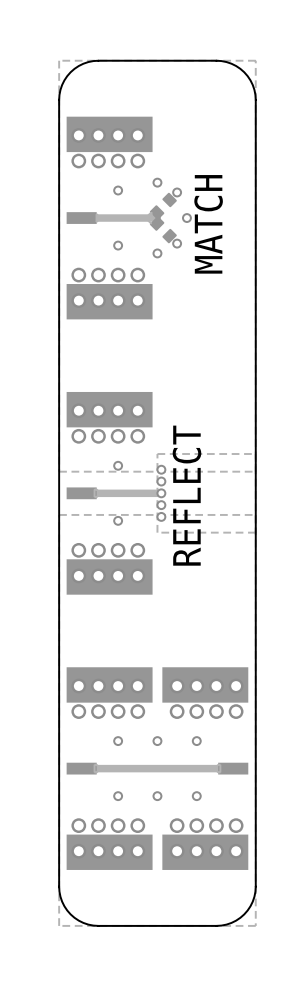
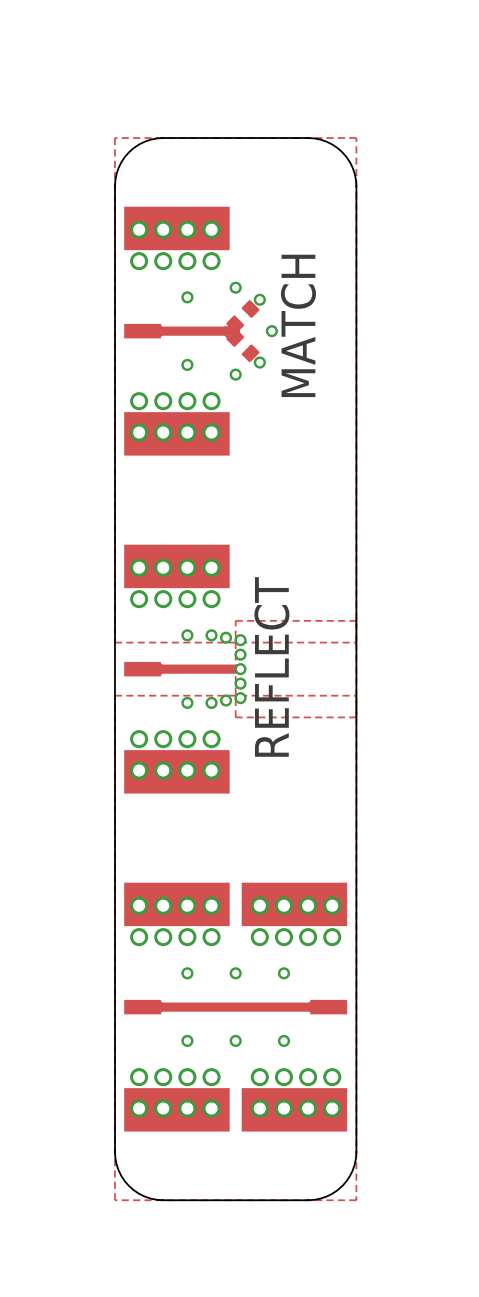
via: none -> (211, 635)
via: none -> (226, 637)
via: none -> (226, 700)
via: none -> (211, 702)

